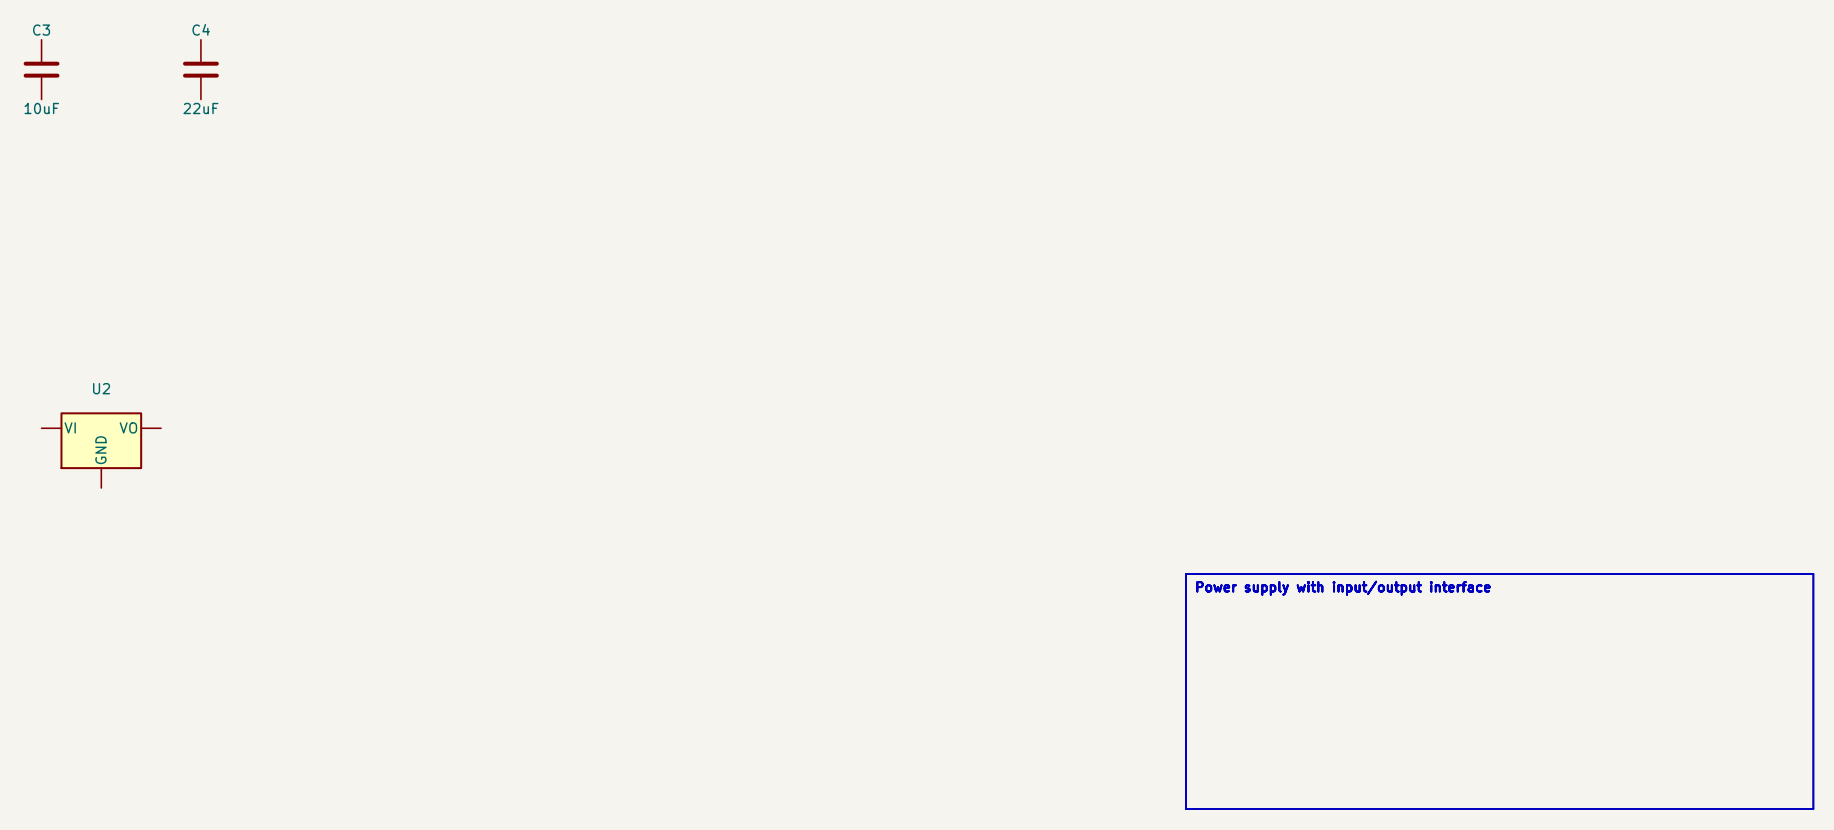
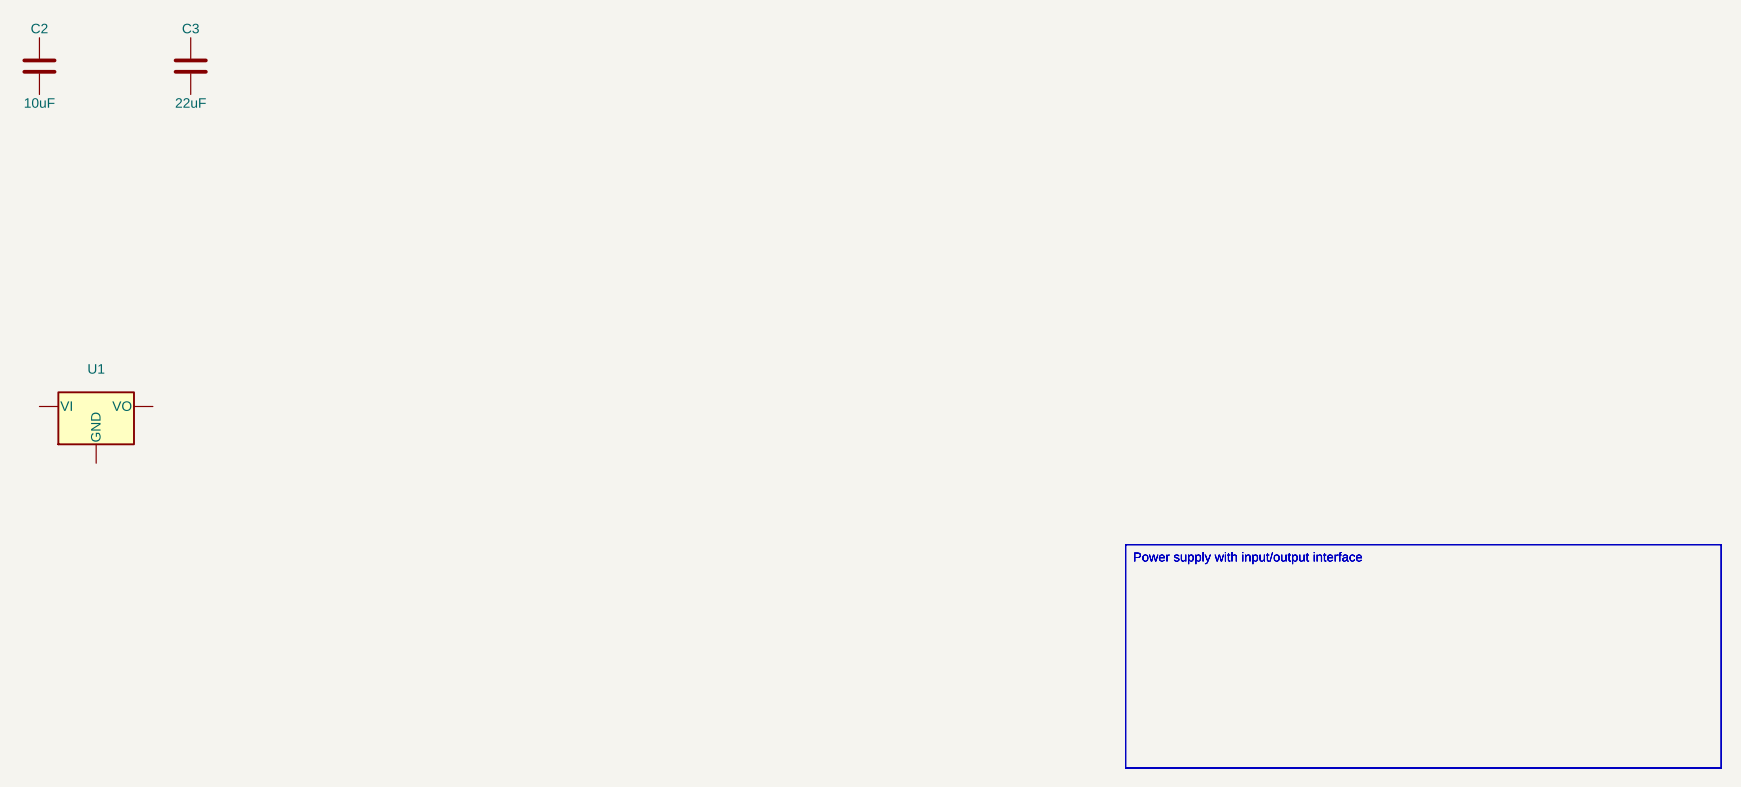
C4 name: C4 (201, 29) -> C3 (190, 28)
C3 name: C3 (41, 30) -> C2 (39, 28)
U2 name: U2 (101, 388) -> U1 (96, 368)

